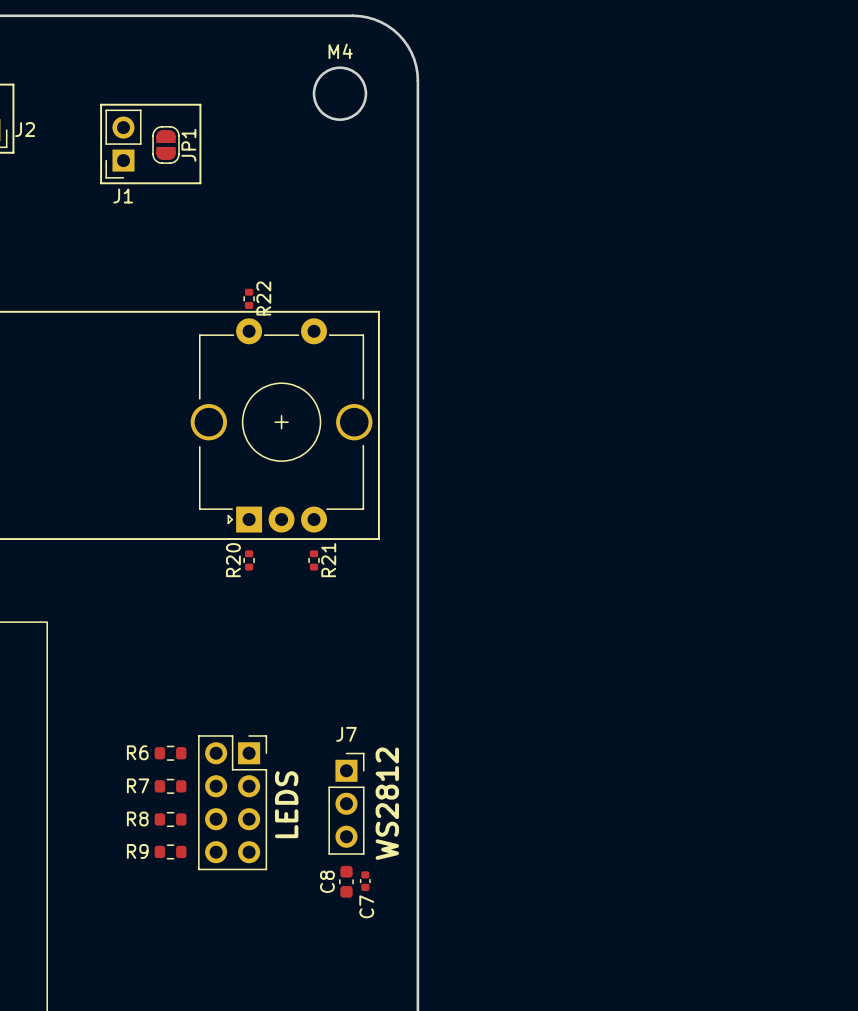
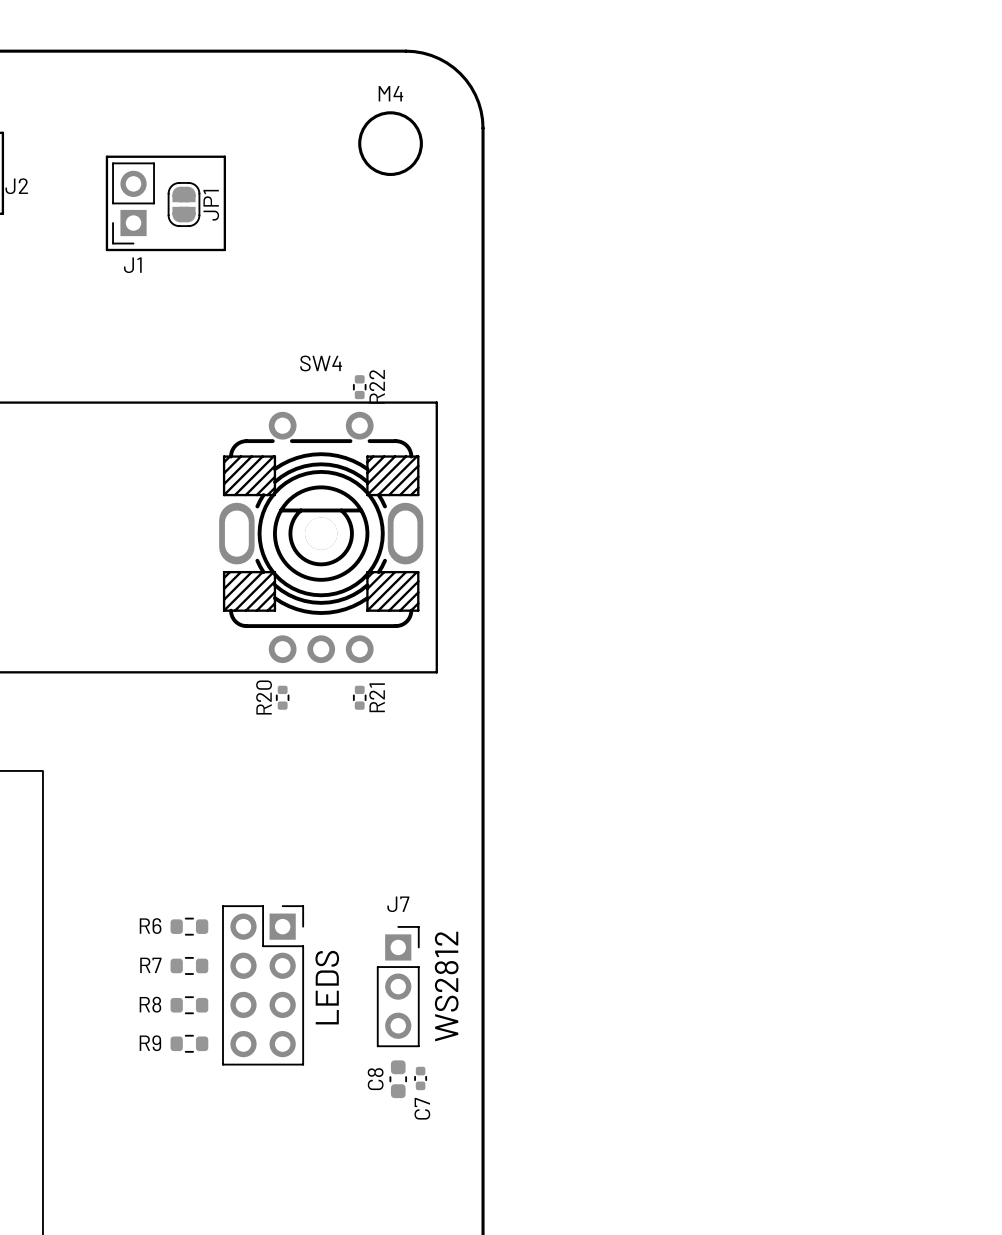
R22 position: (249, 298) -> (359, 387)
part: (281, 425) -> none
SW4: none -> (321, 537)

